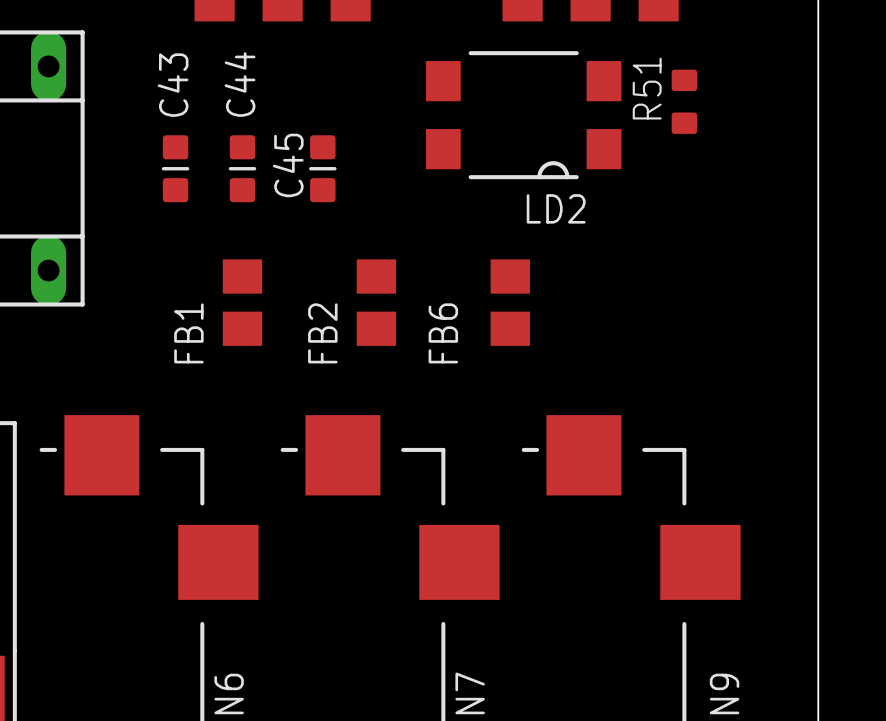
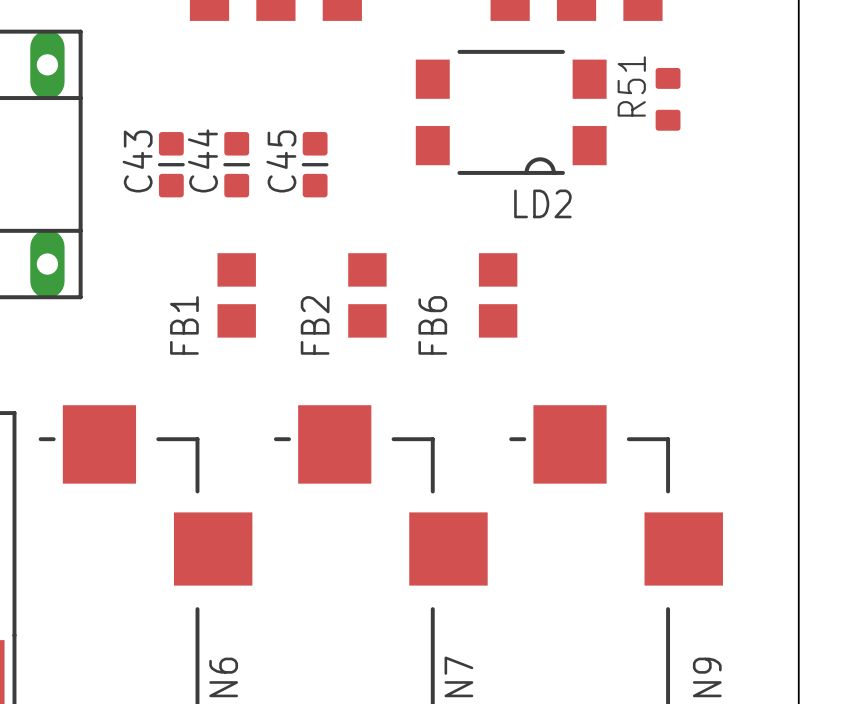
C44 name position: C44 (240, 84) -> C44 (202, 160)
C43 name position: C43 (173, 85) -> C43 (137, 161)

